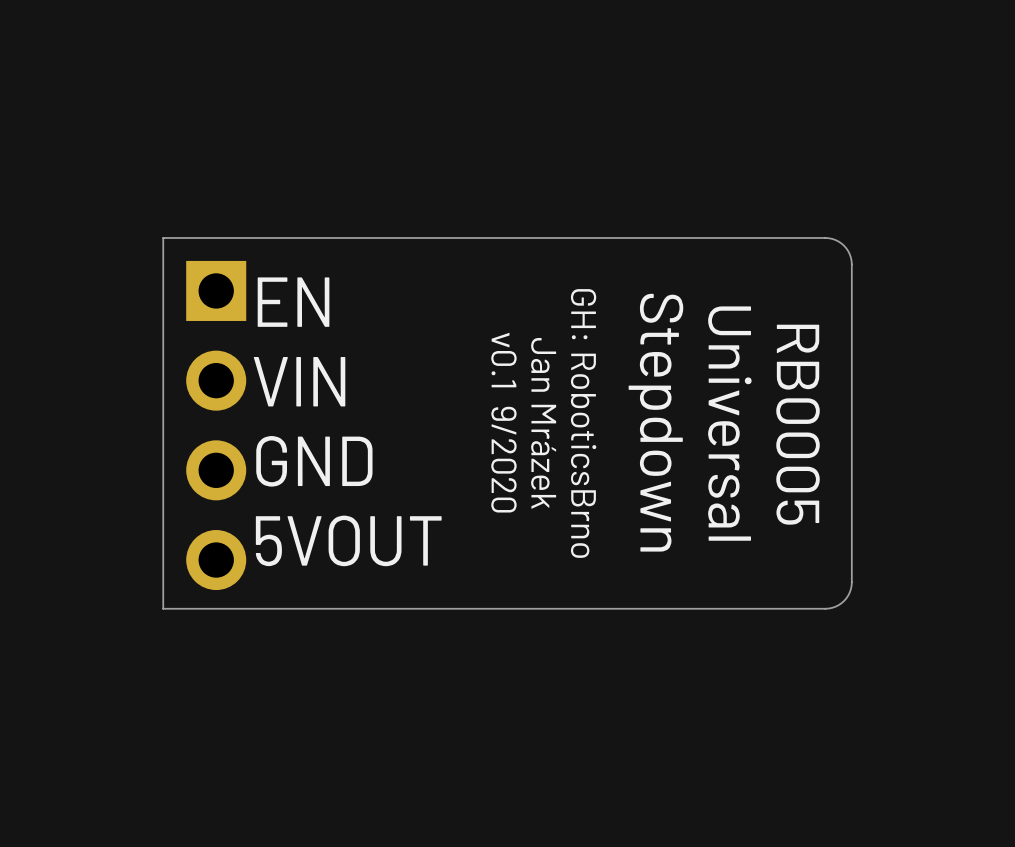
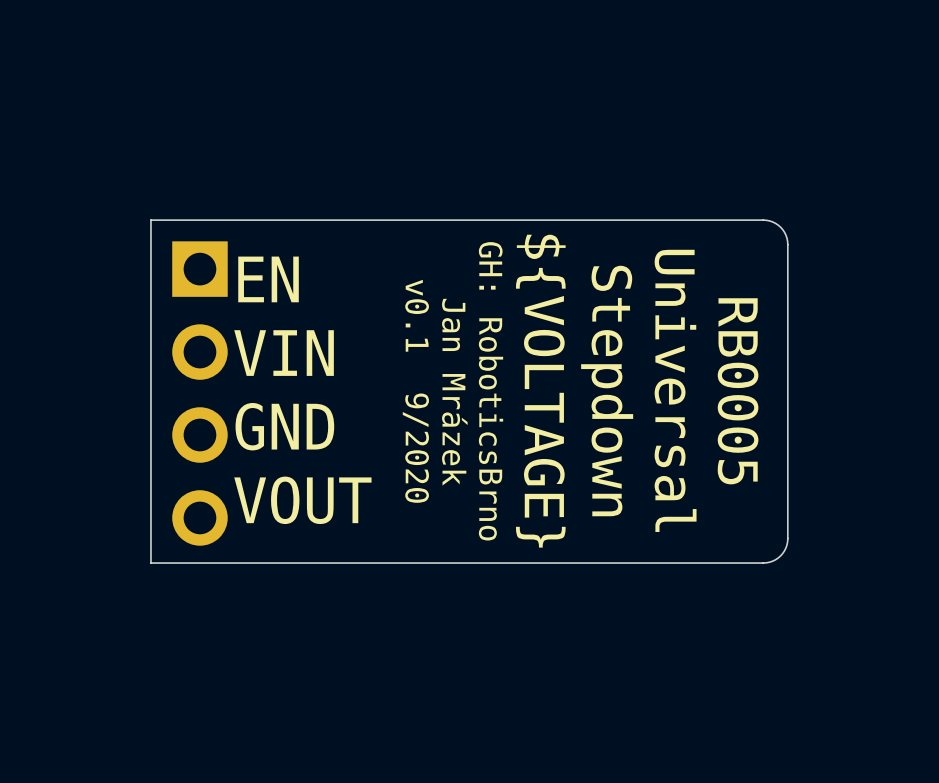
text position: v0.1 9/2020 (503, 422) -> v0.1 9/2020 (415, 391)
text position: Jan Mrázek (543, 423) -> Jan Mrázek (454, 392)
text position: GH: RoboticsBrno (583, 423) -> GH: RoboticsBrno (491, 391)
text: none -> ${VOLTAGE} (540, 391)
text: 5VOUT (348, 540) -> VOUT (302, 500)

